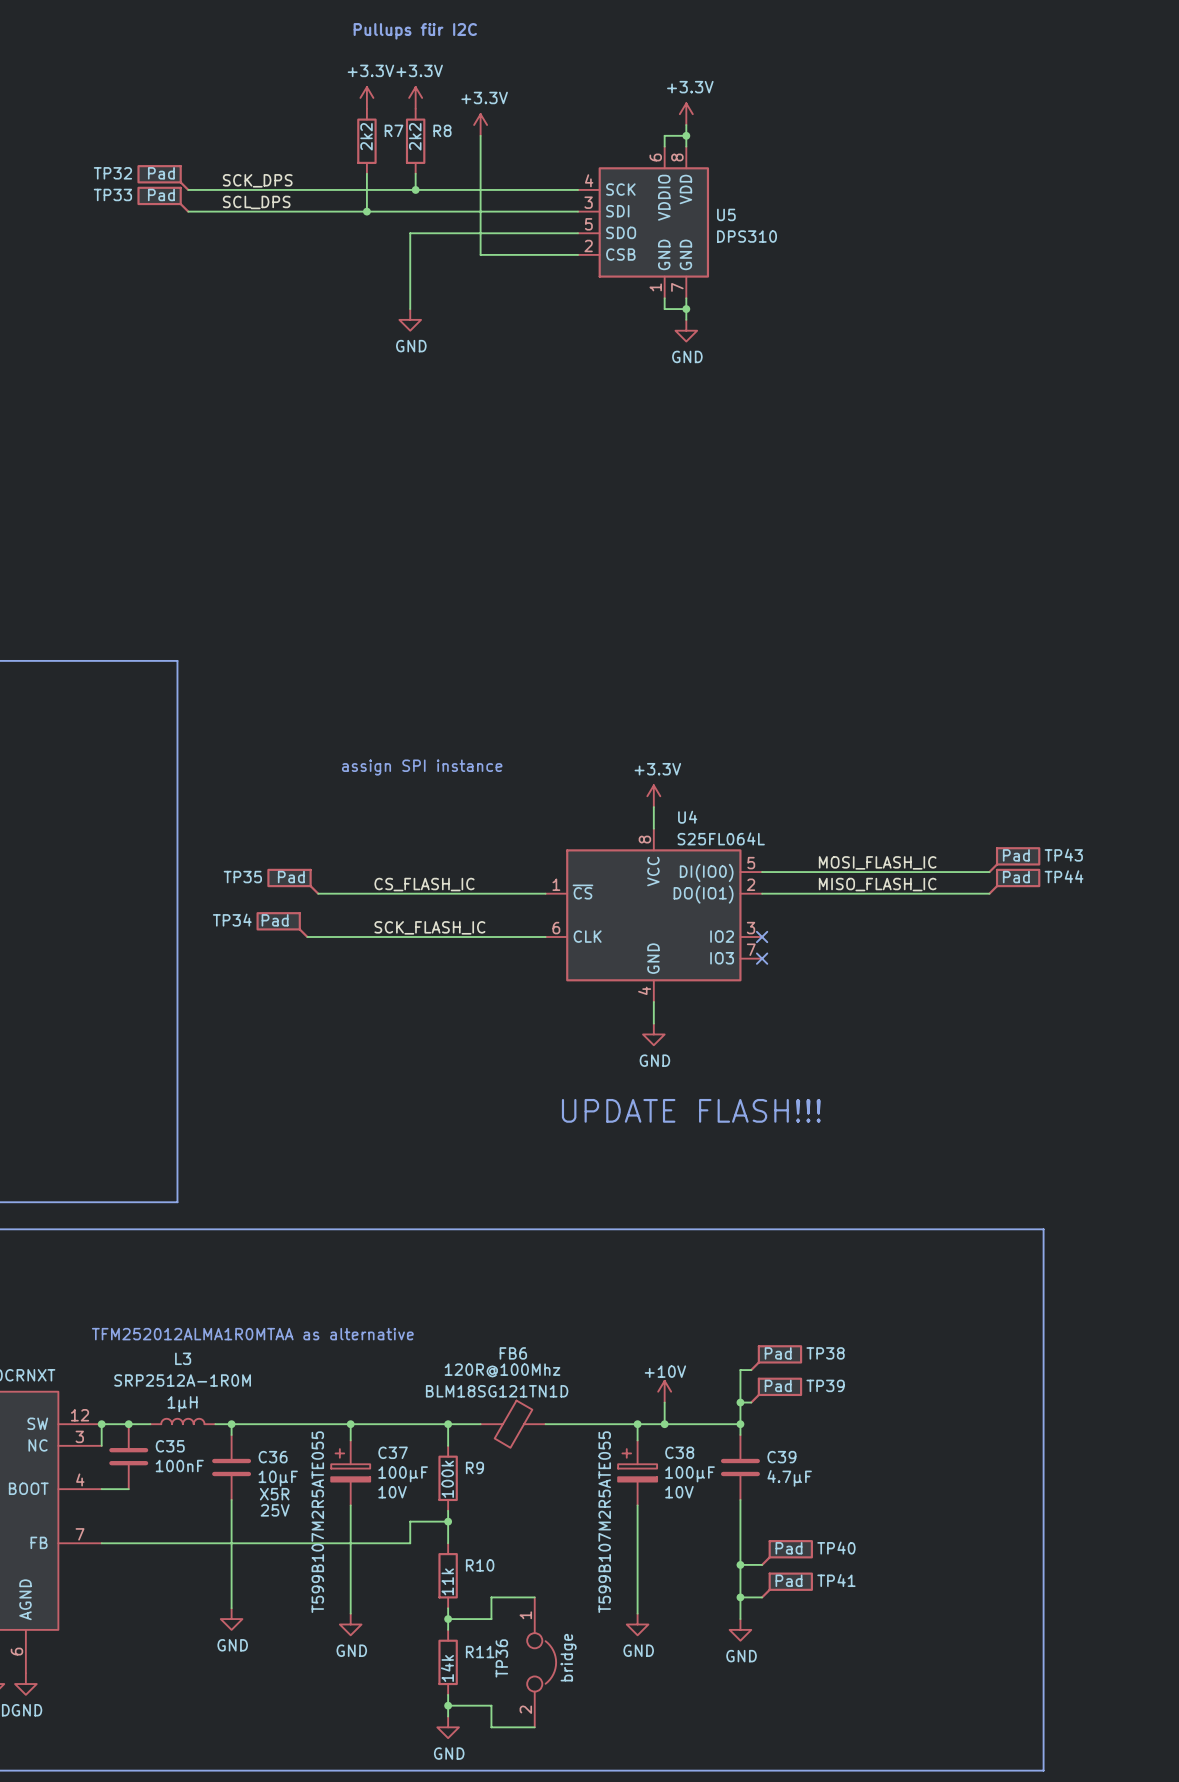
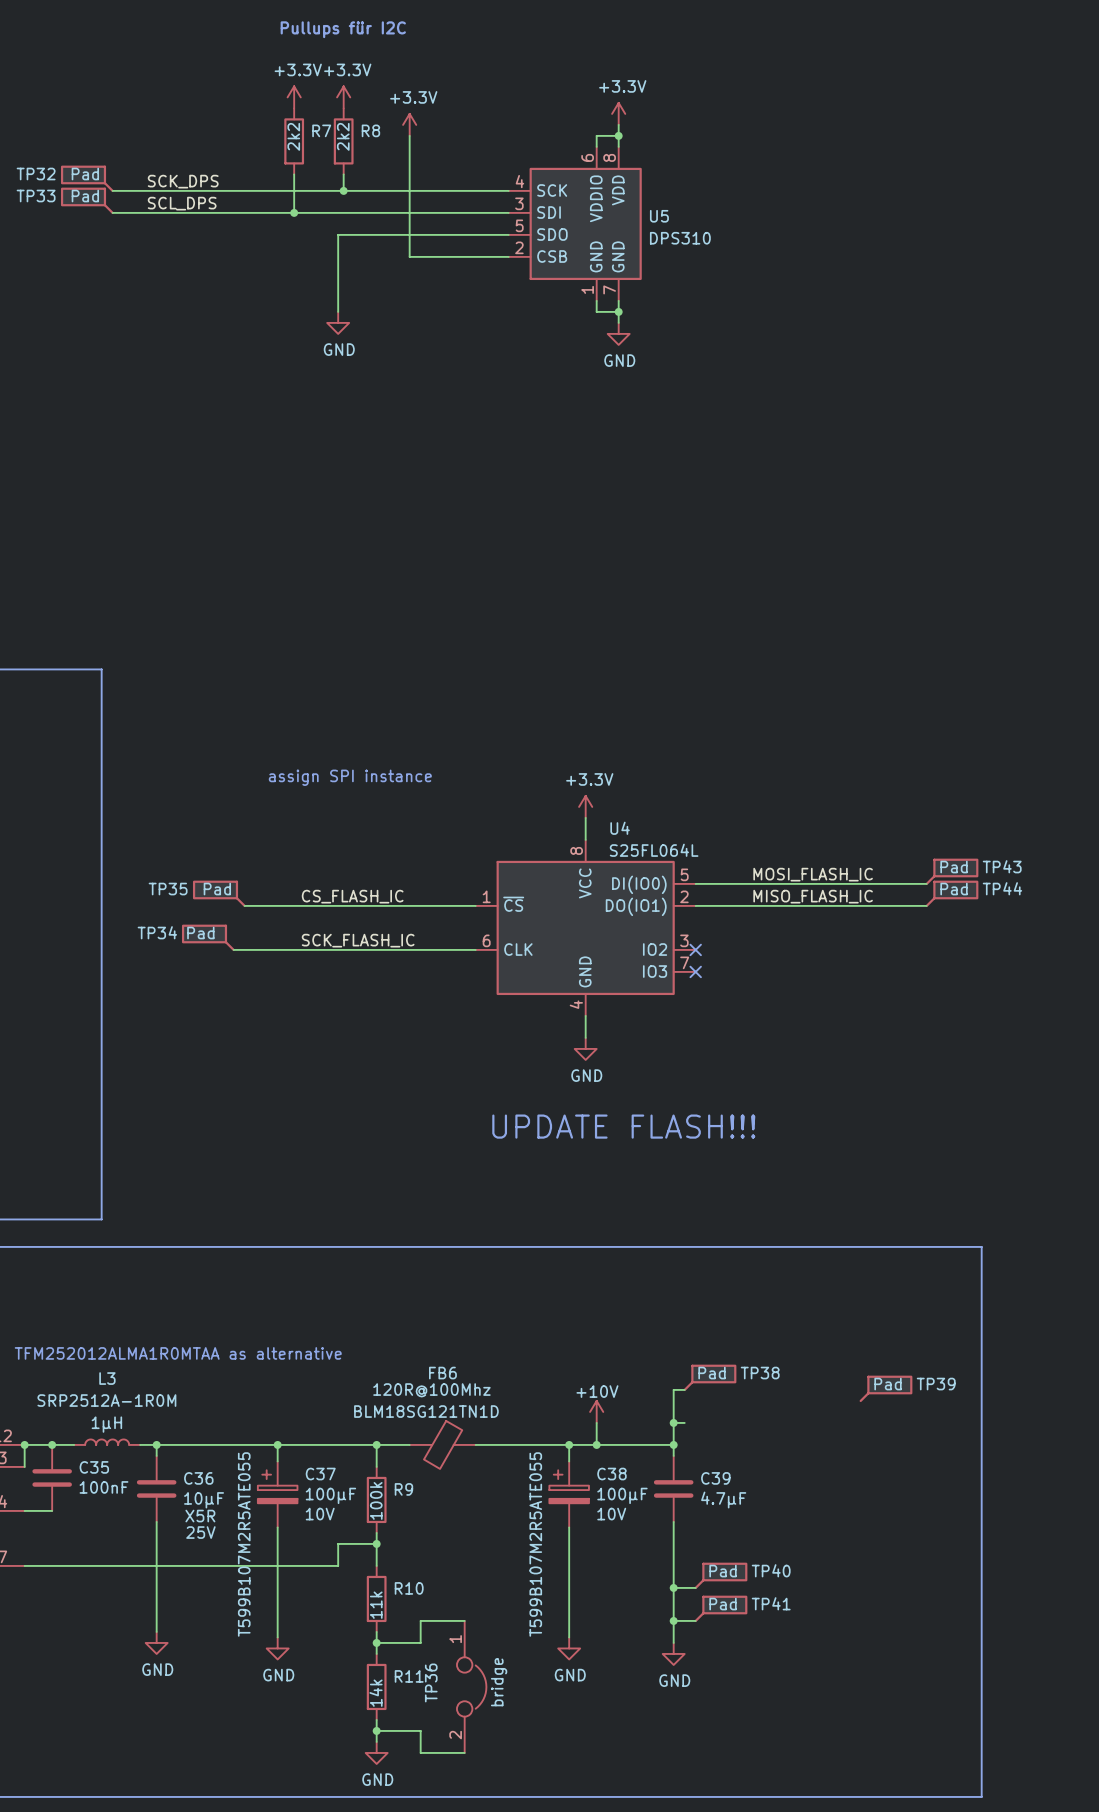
TP39 position: (776, 1390) -> (885, 1388)

